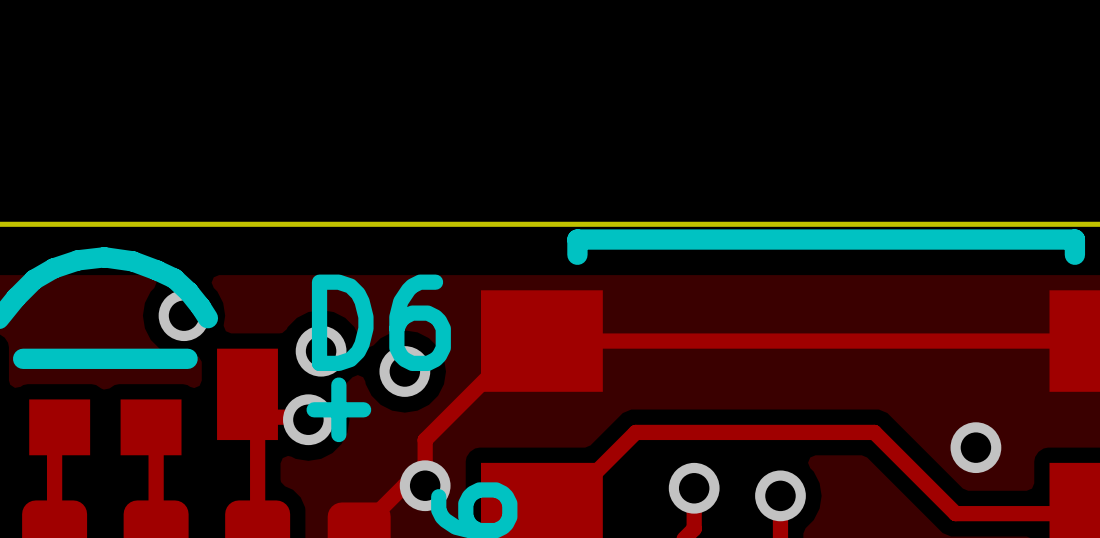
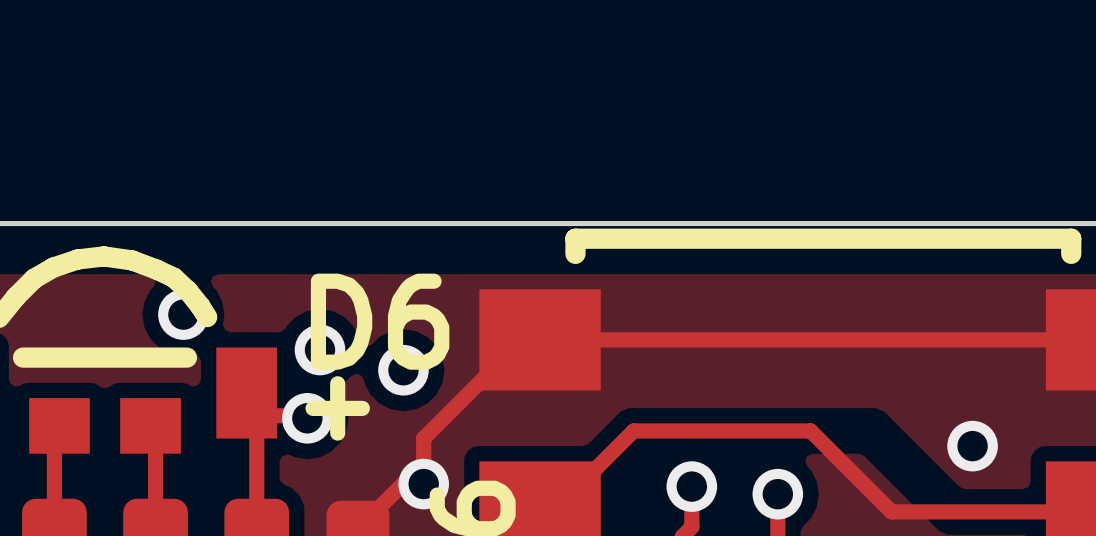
track: (813, 432) (874, 432) (955, 513) -> (810, 430) (891, 511) (952, 511)

